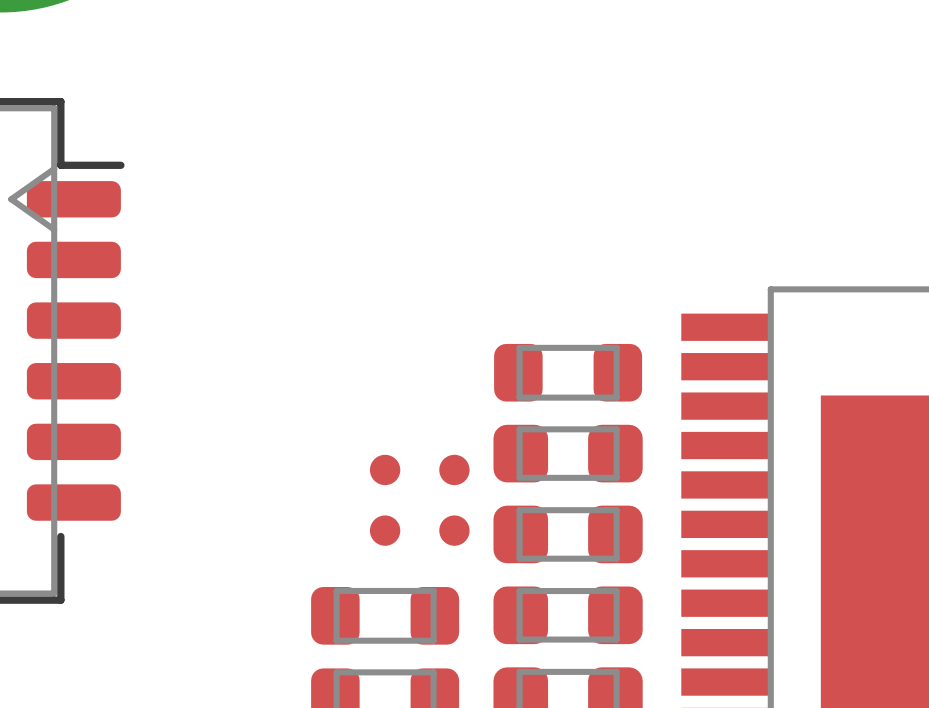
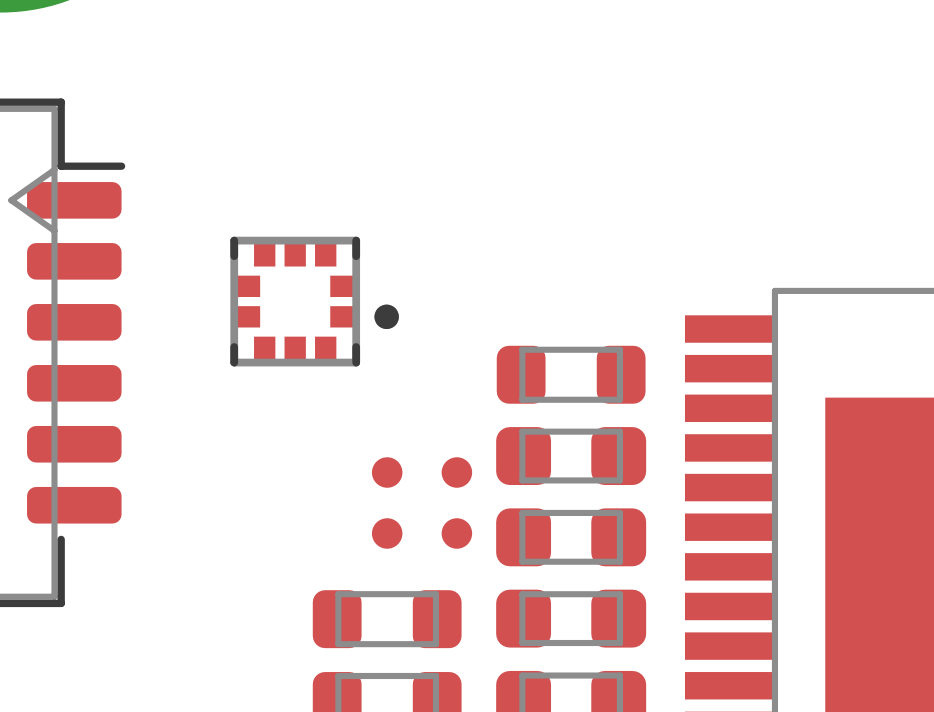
part: none -> (314, 301)

